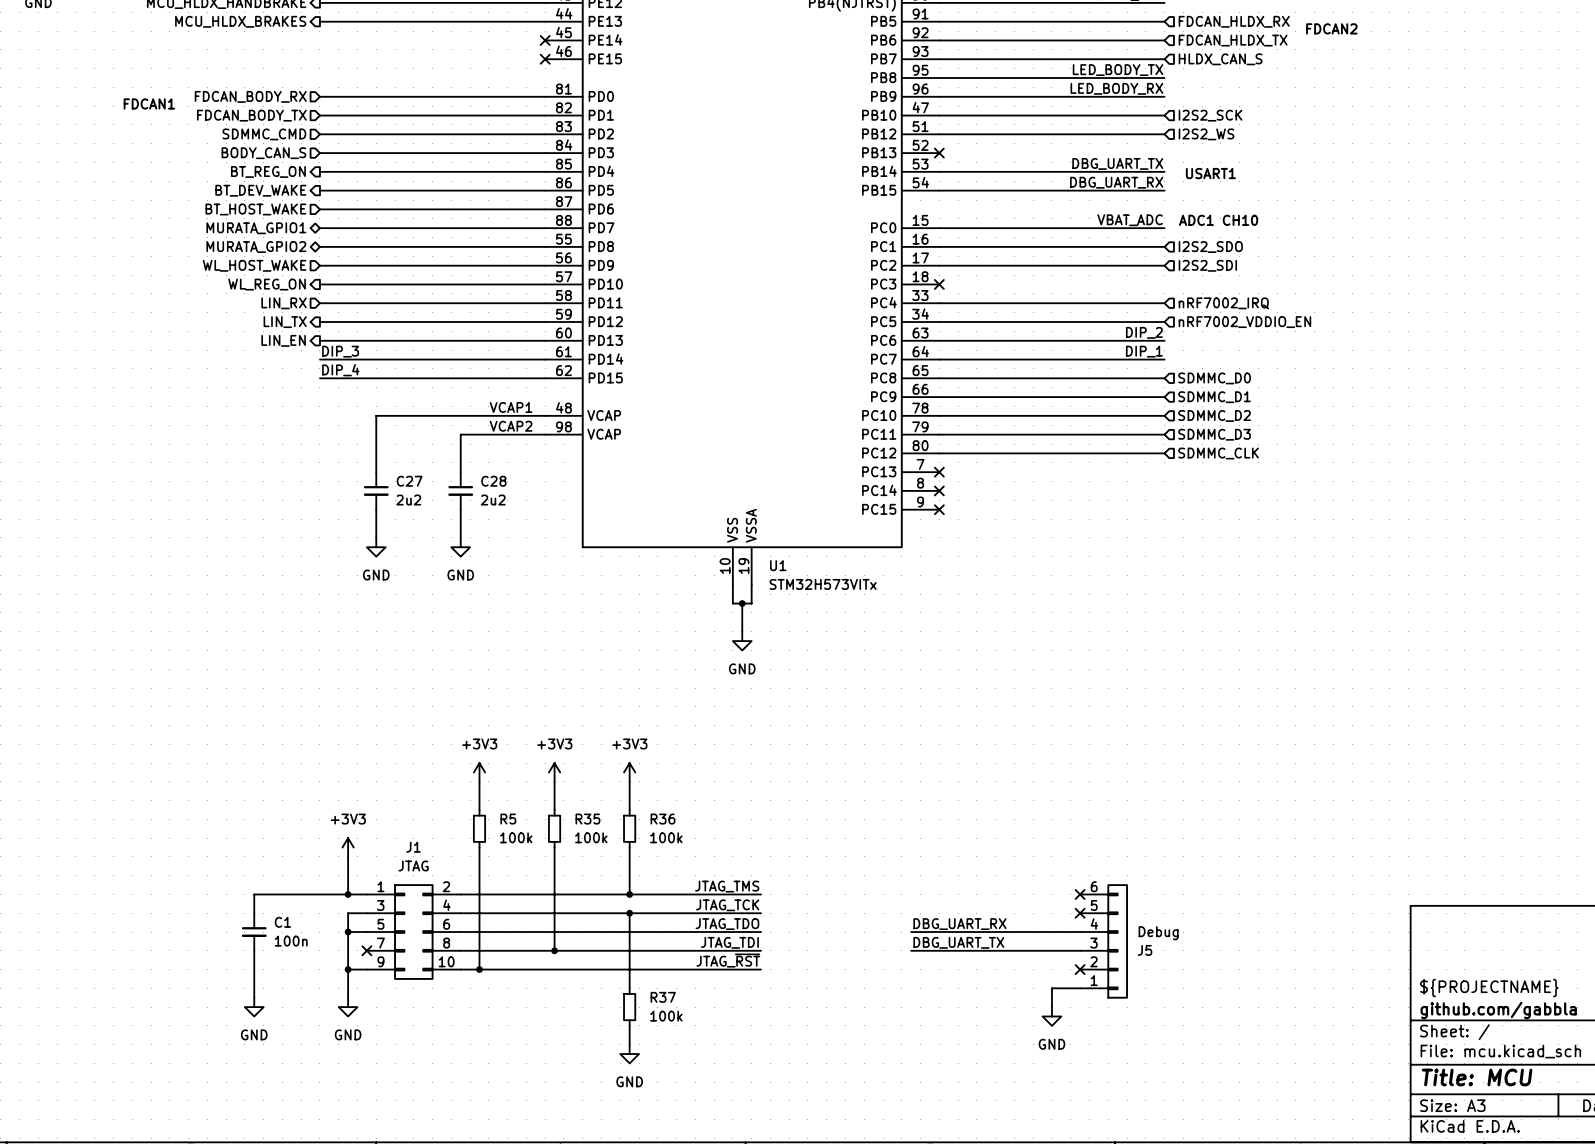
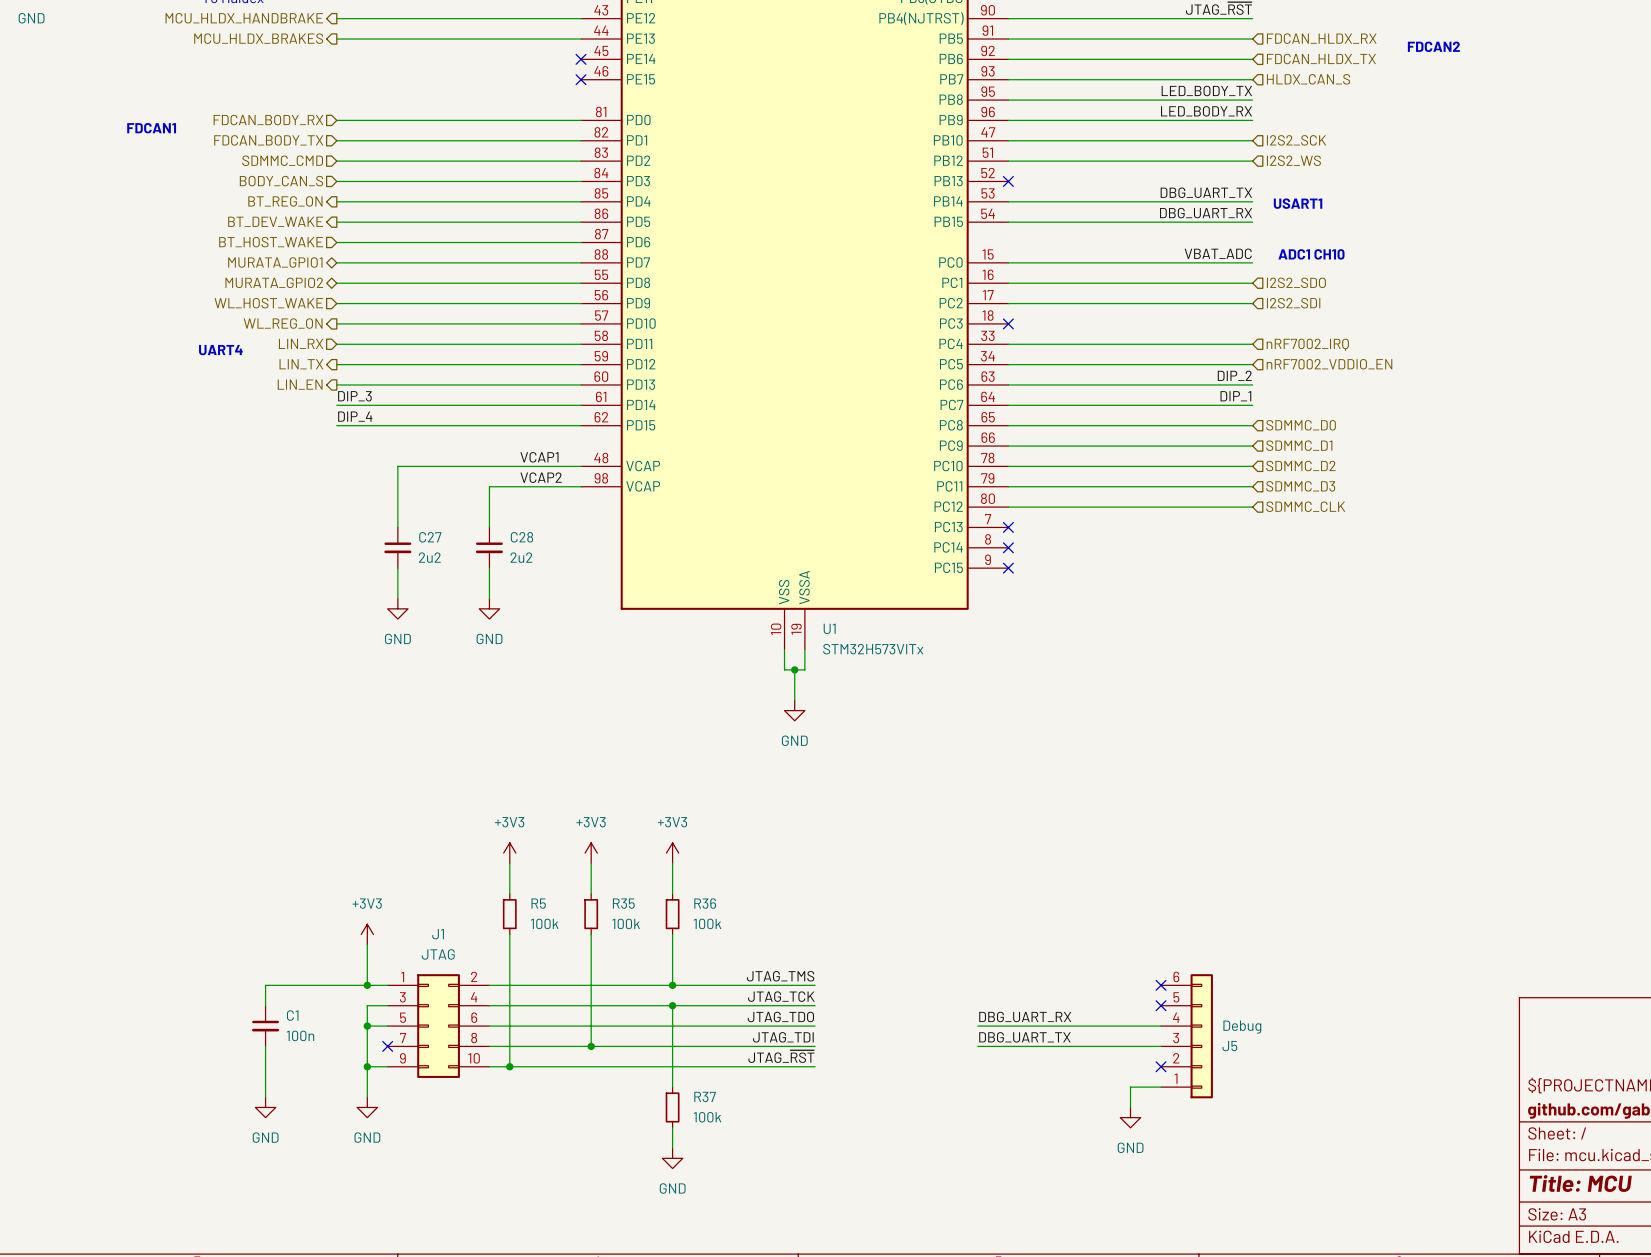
text: none -> UART4 (220, 350)

